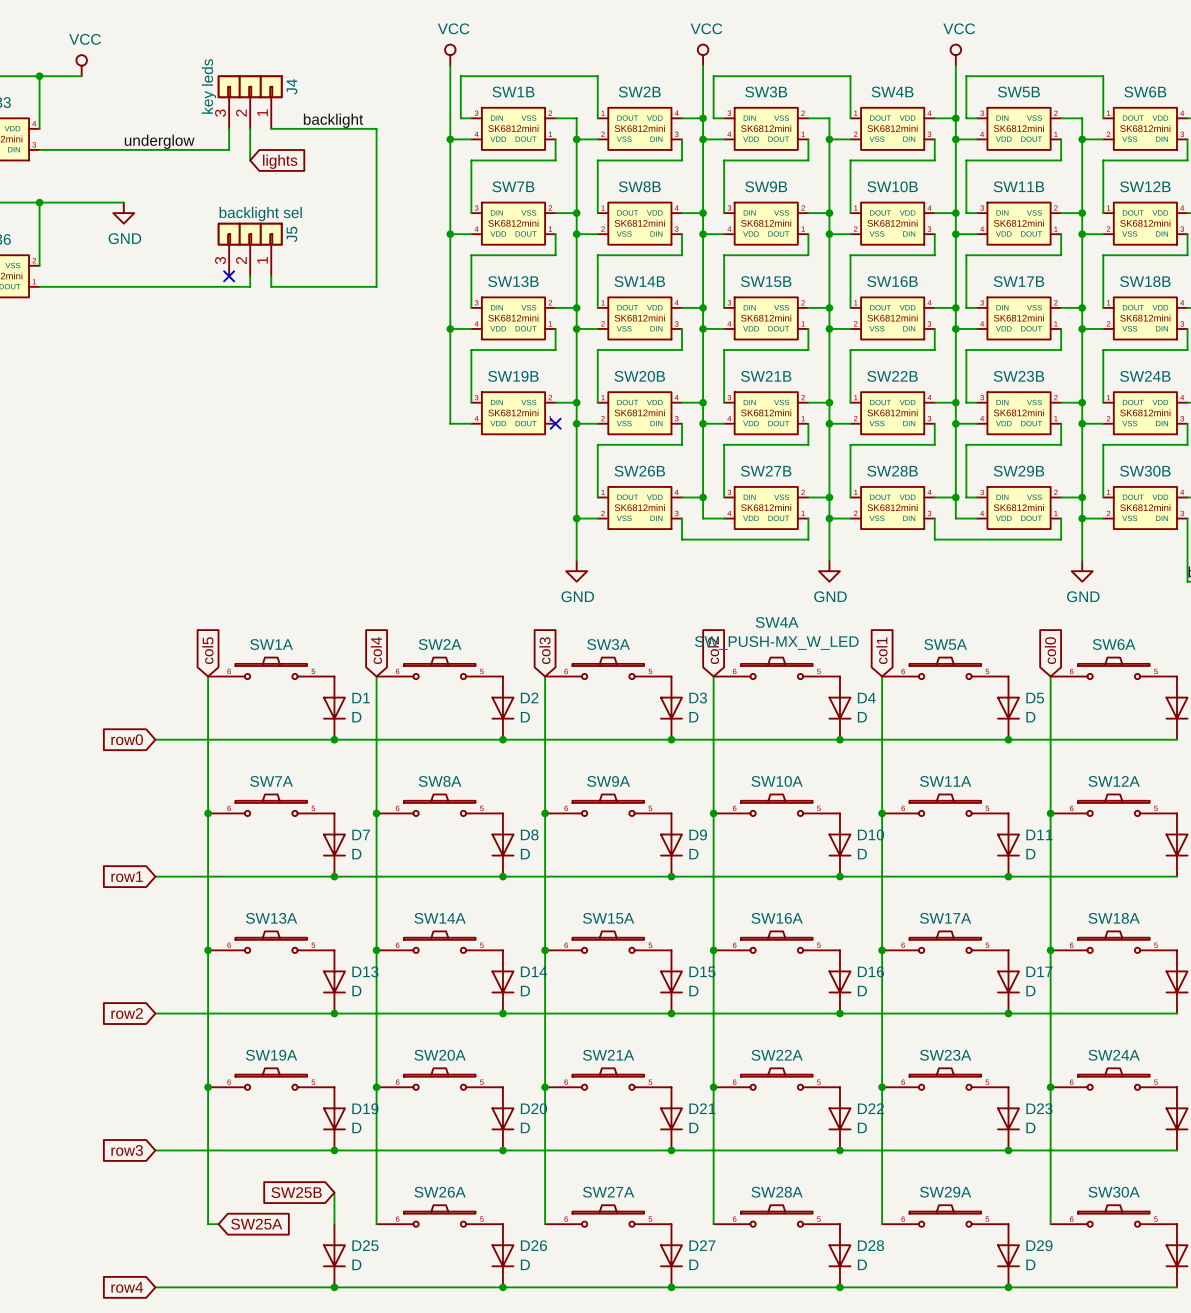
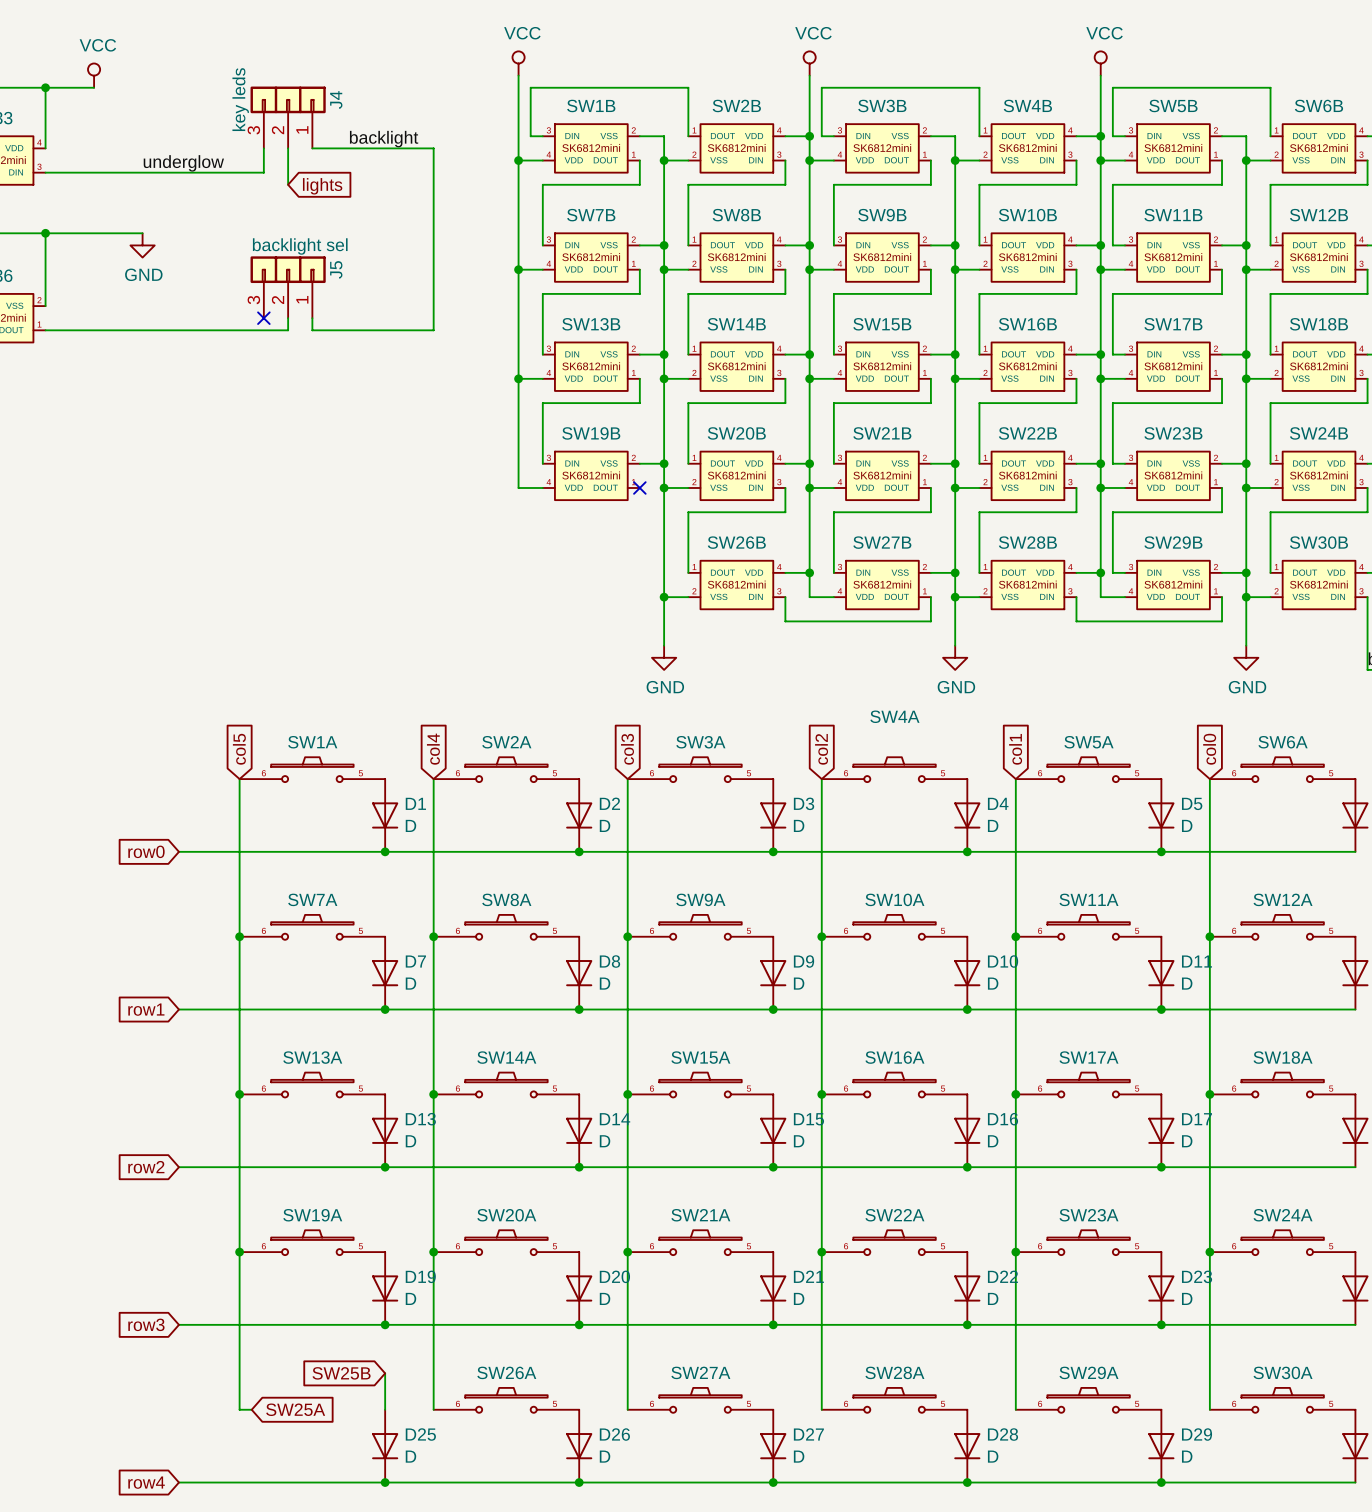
SW4A value: SW_PUSH-MX_W_LED (776, 643) -> none

